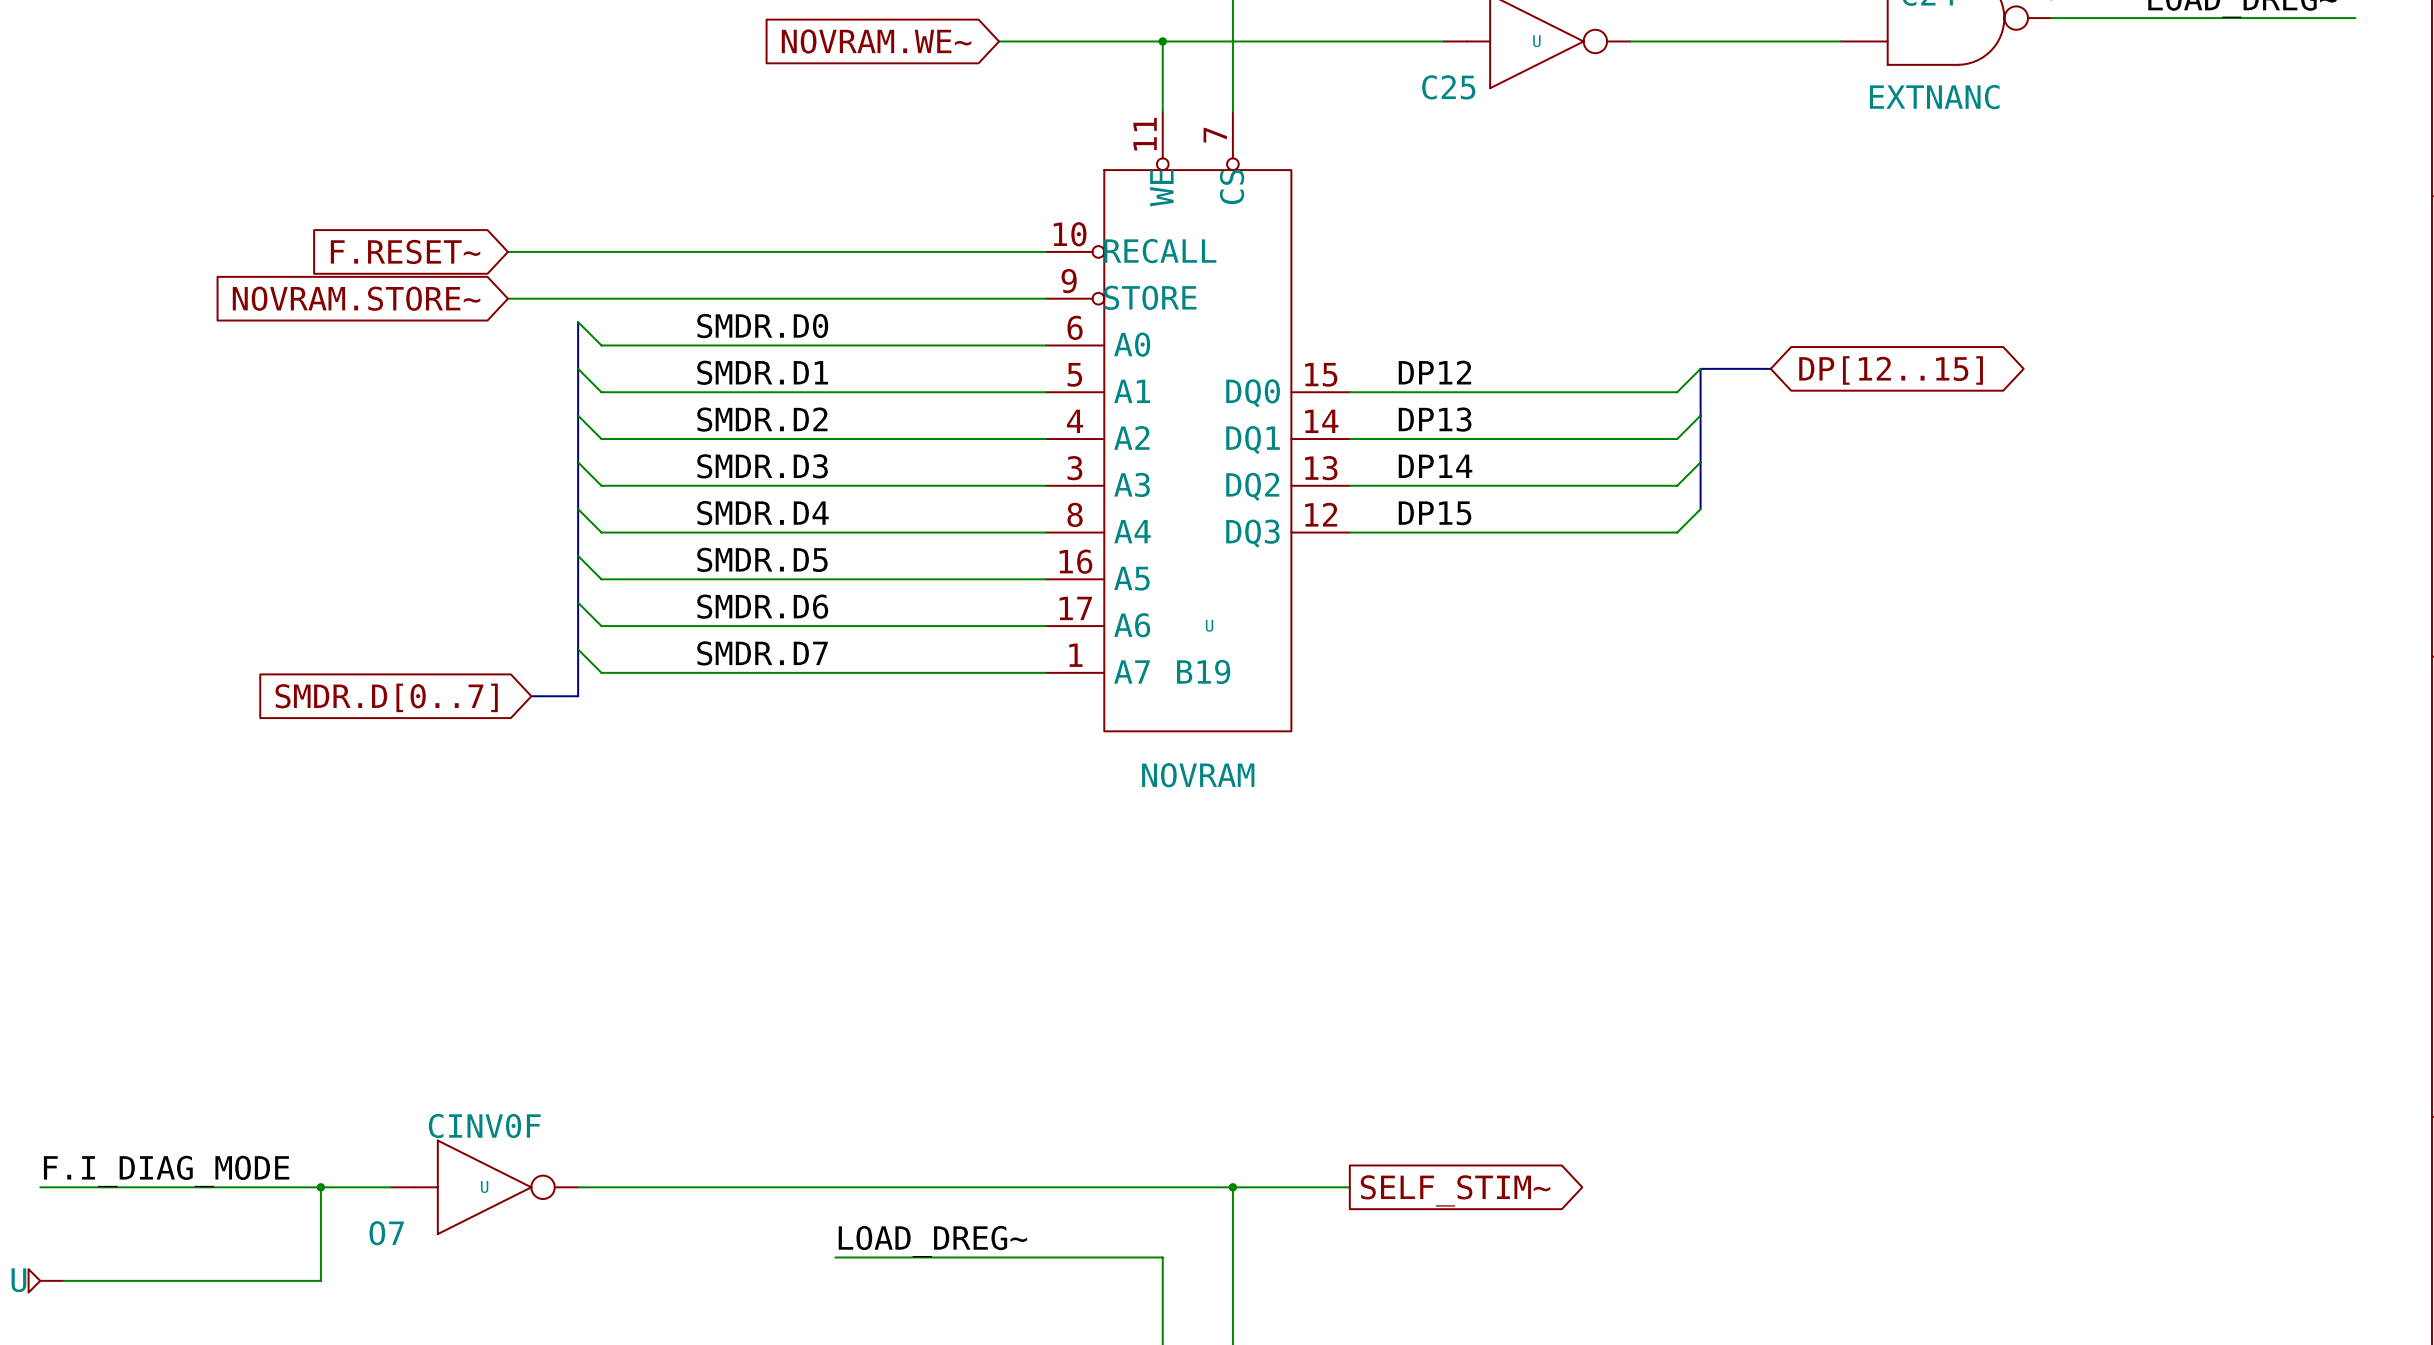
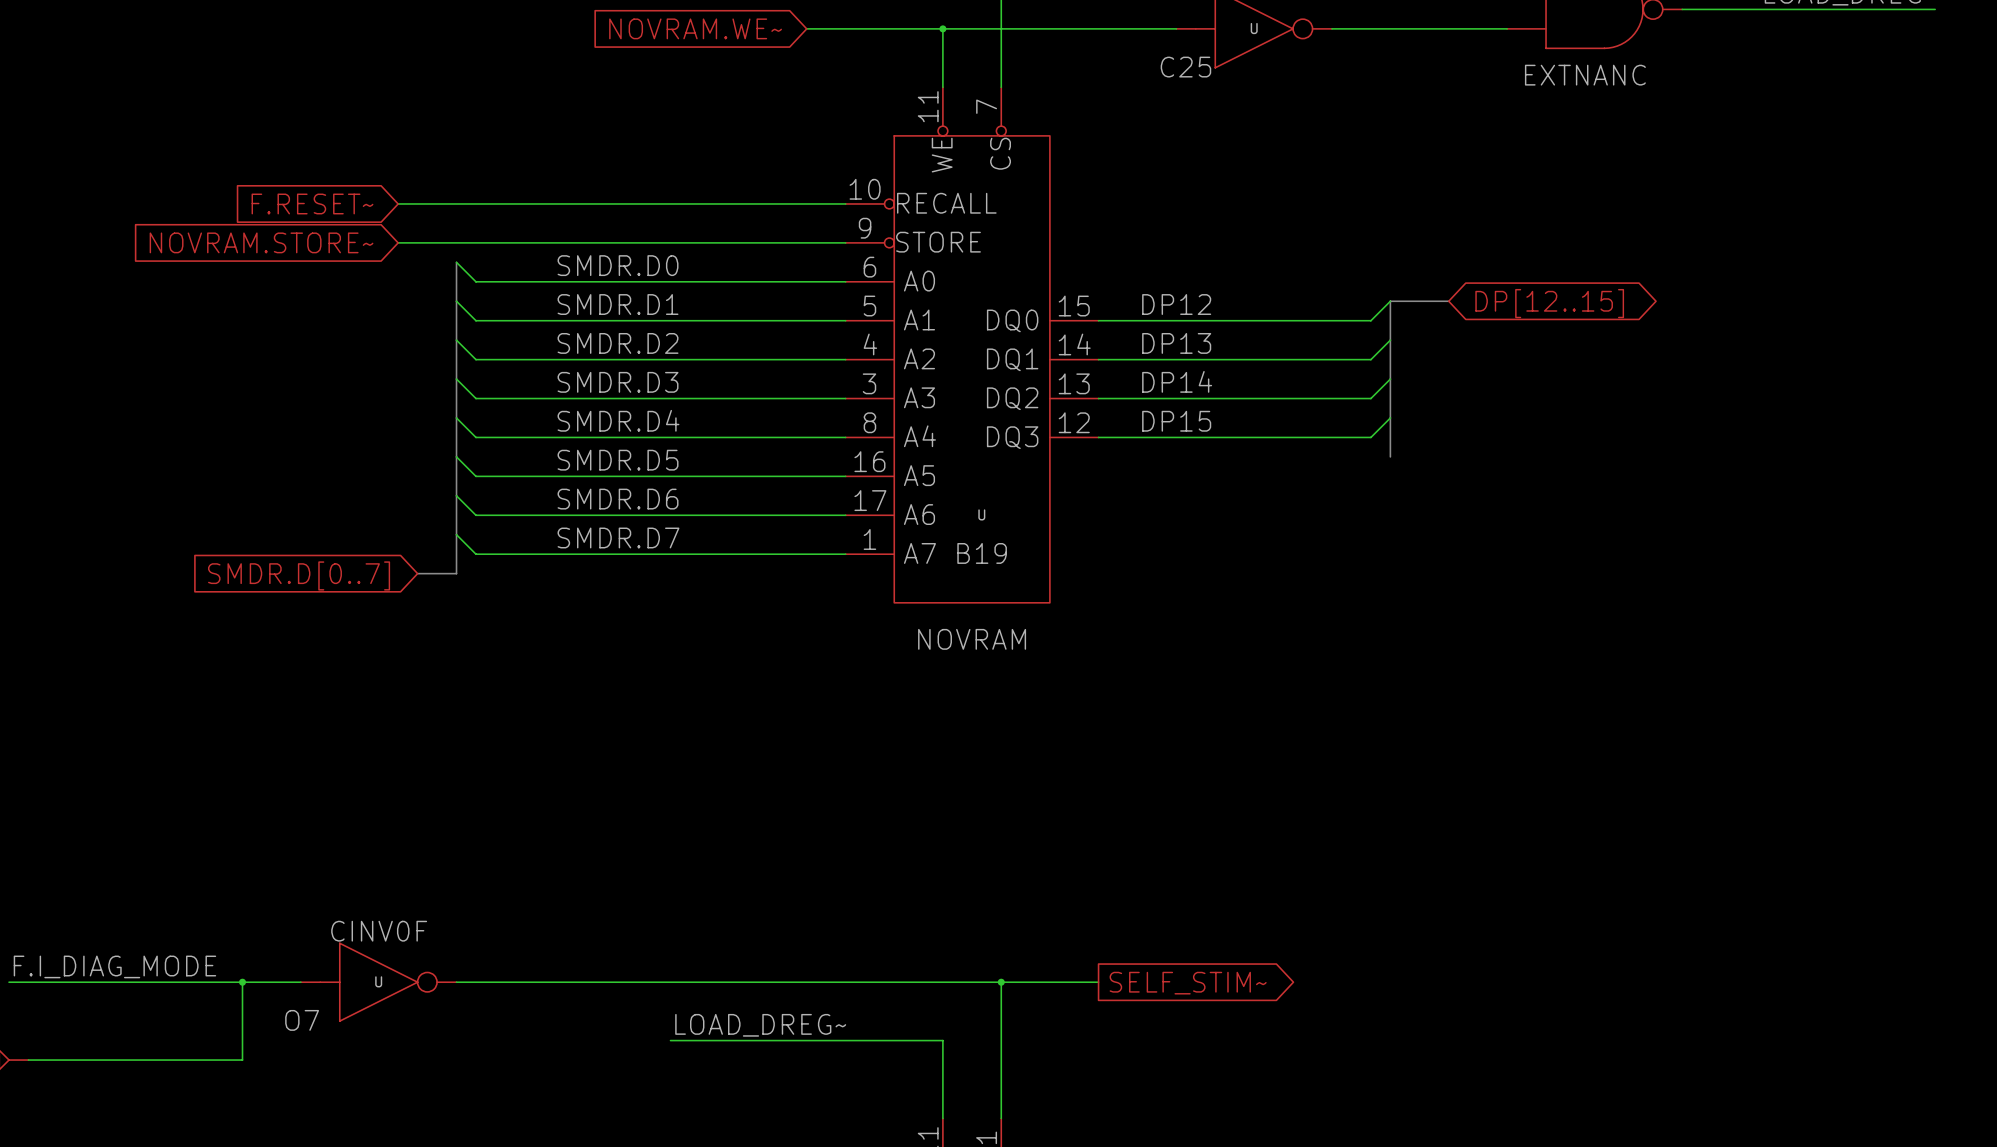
bus: none -> (1390, 418) (1390, 456)

